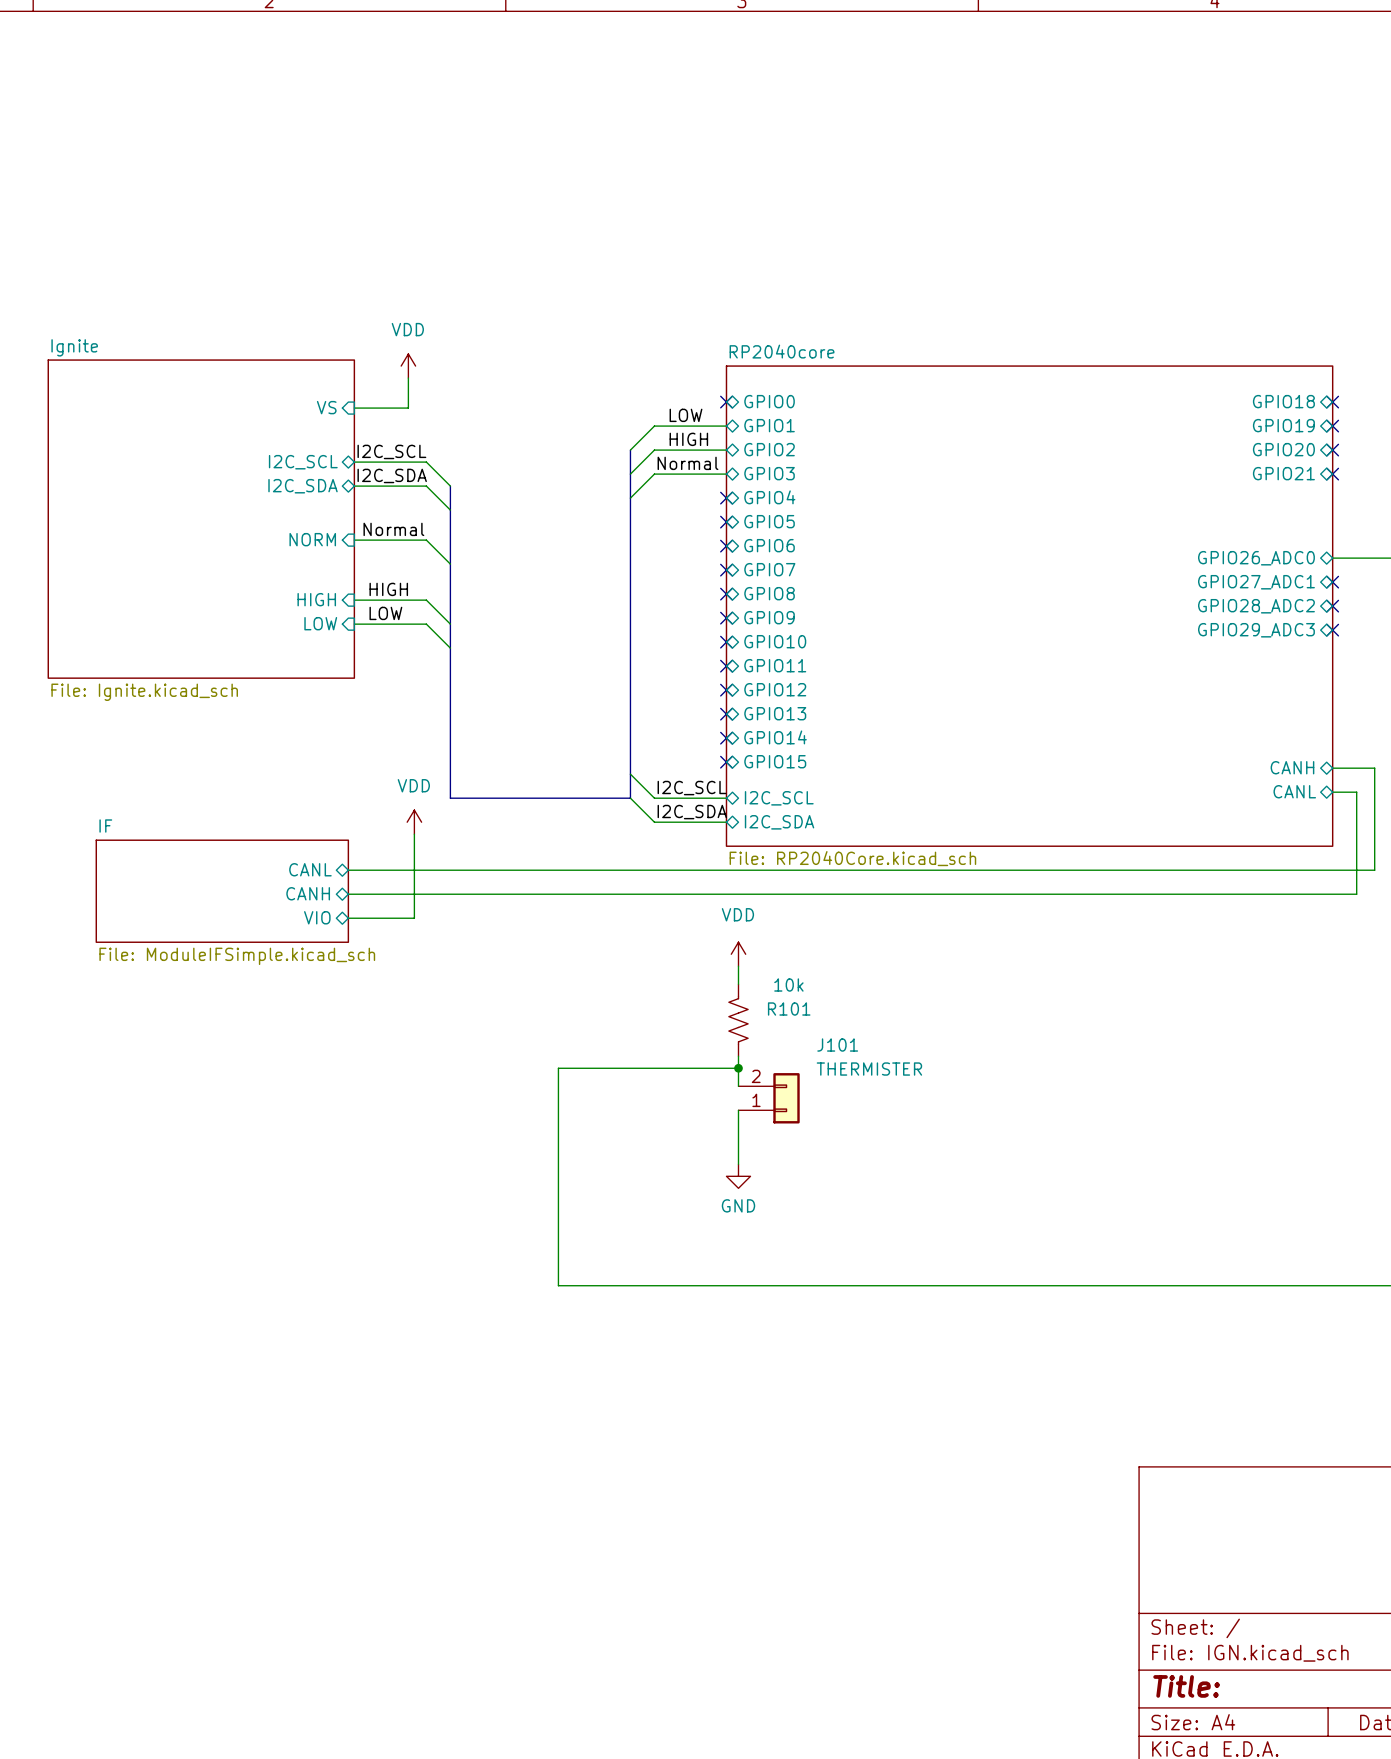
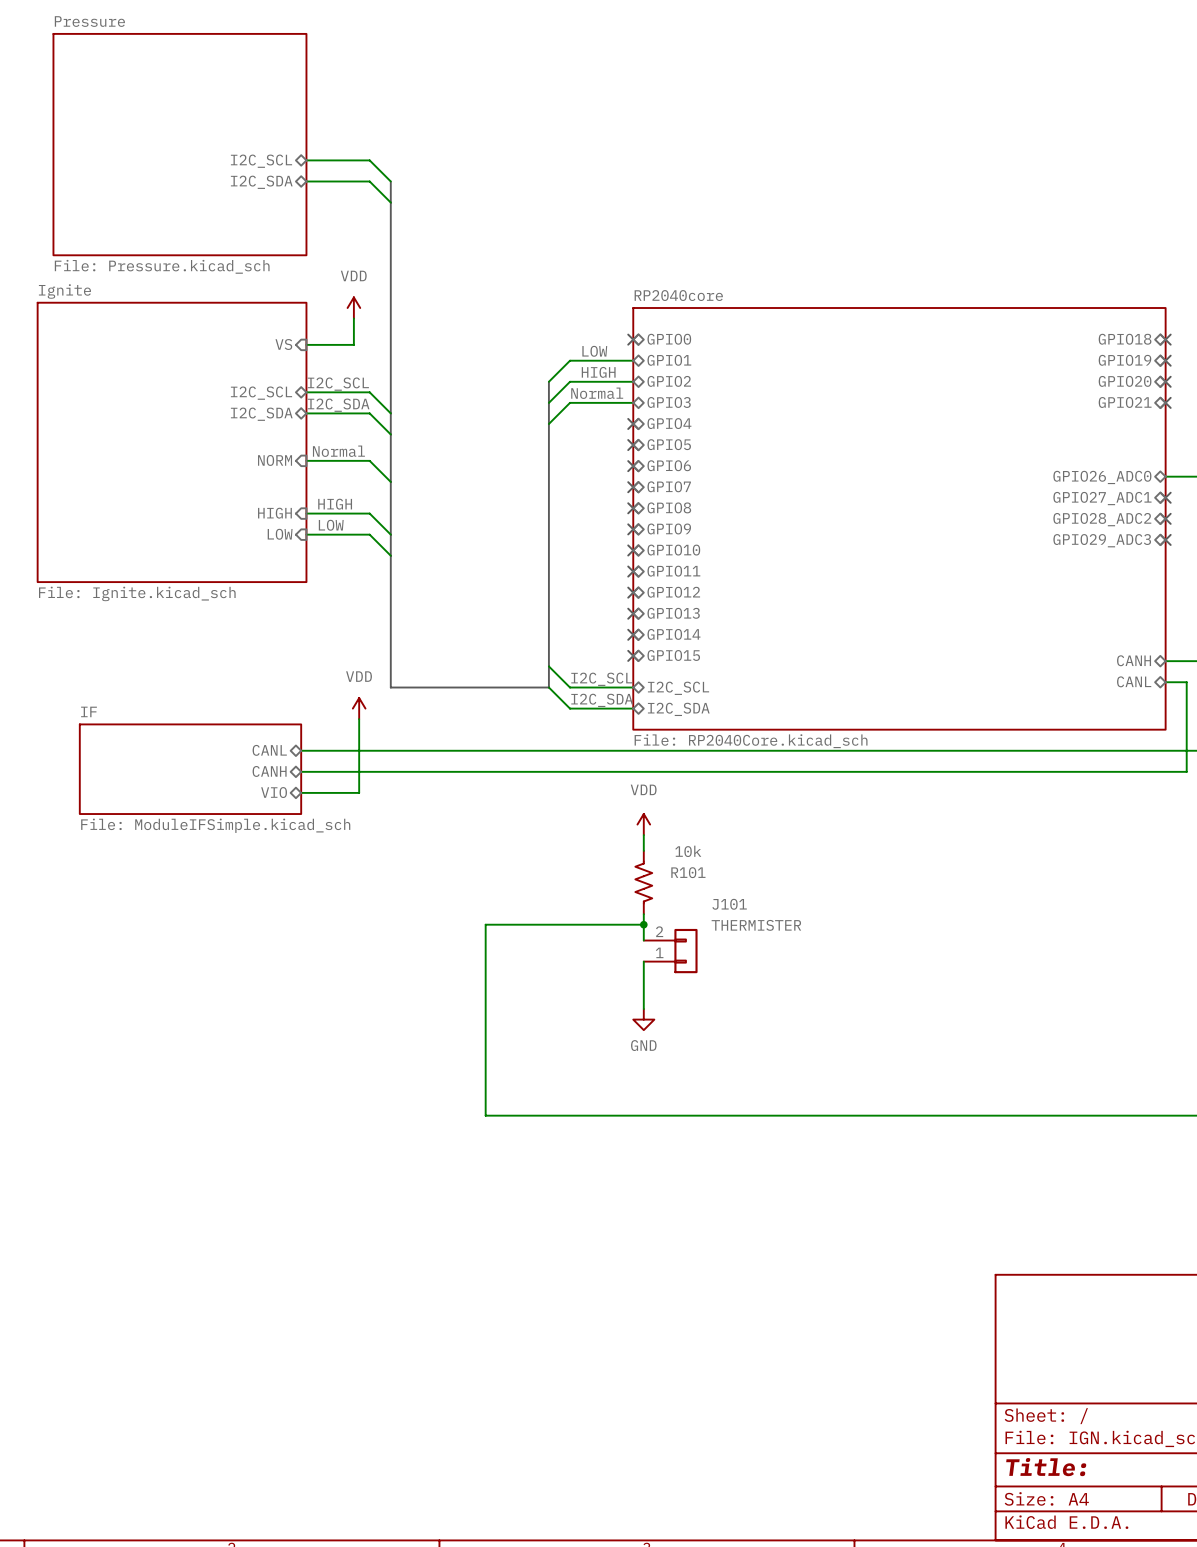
sheet Pressure: none -> File: Pressure.kicad_sch (179, 144)
sheet pin: none -> I2C_SCL (261, 161)
wire: none -> (306, 160) (369, 160) (390, 181)
sheet pin: none -> I2C_SDA (261, 182)
wire: none -> (306, 181) (369, 181) (390, 202)
bus: none -> (390, 181) (390, 413)

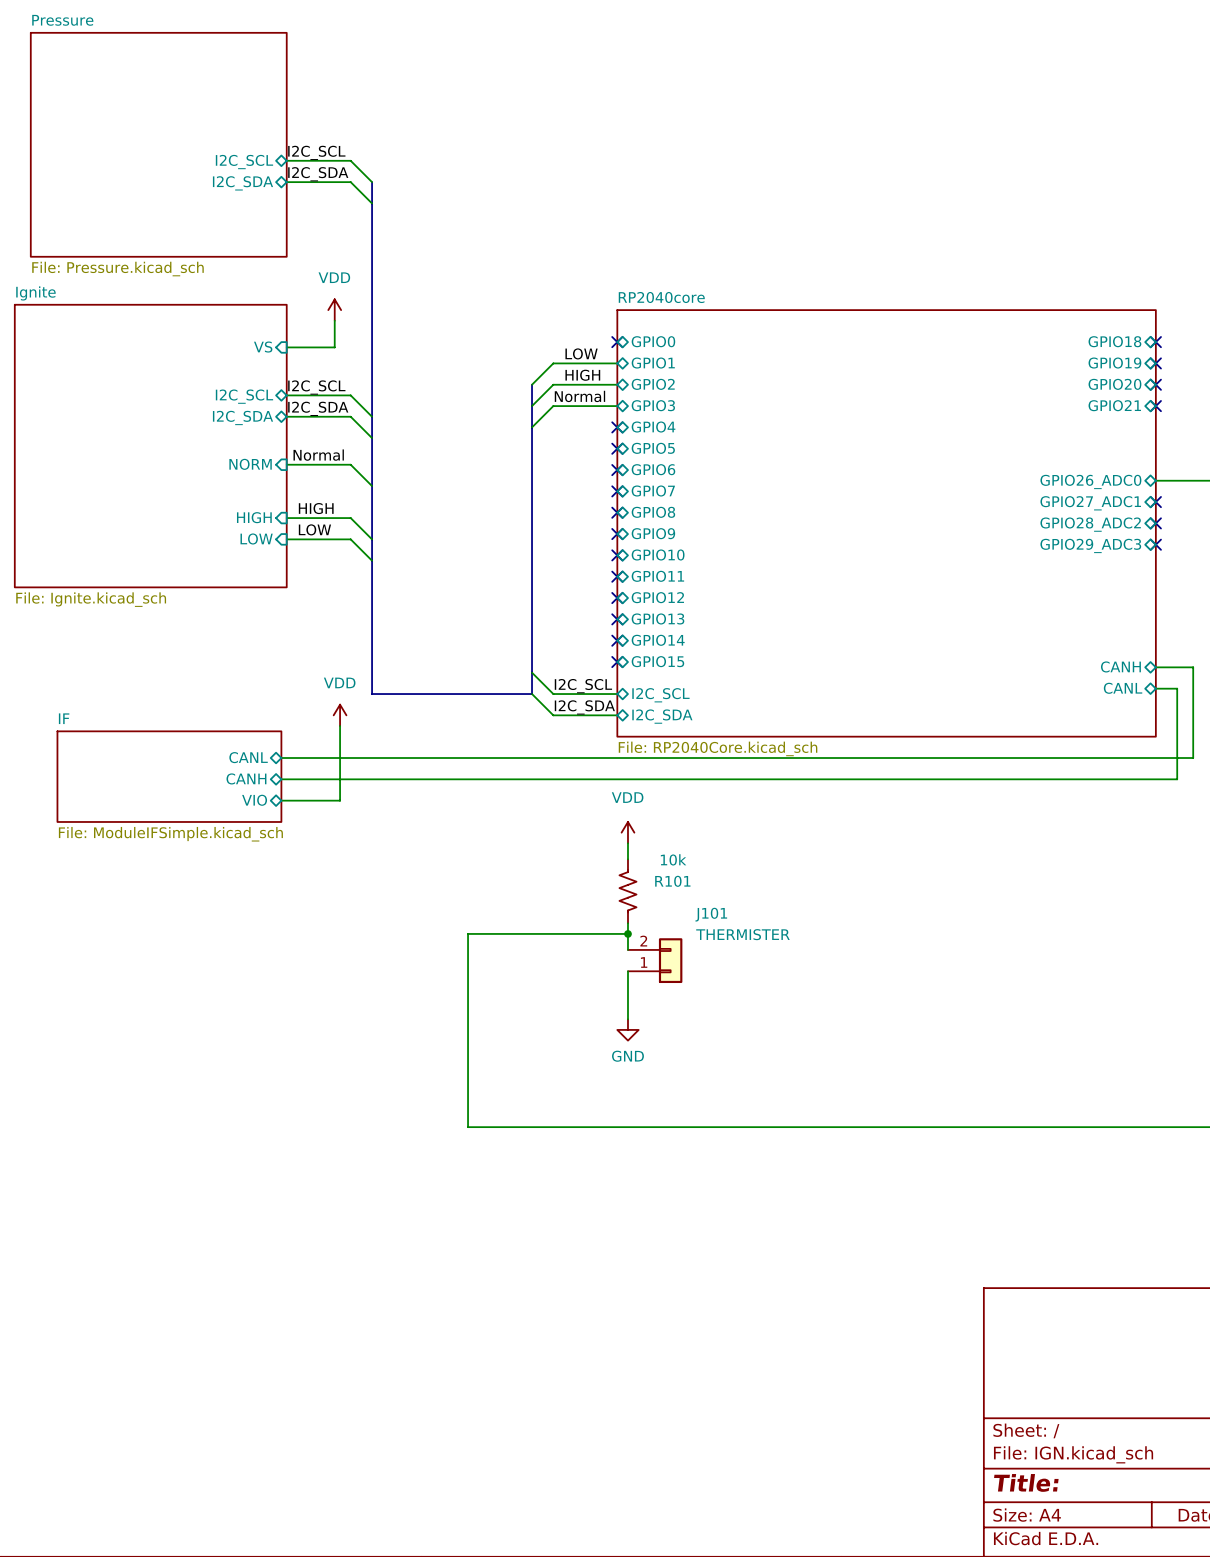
label: none -> I2C_SCL (316, 152)
label: none -> I2C_SDA (318, 174)

